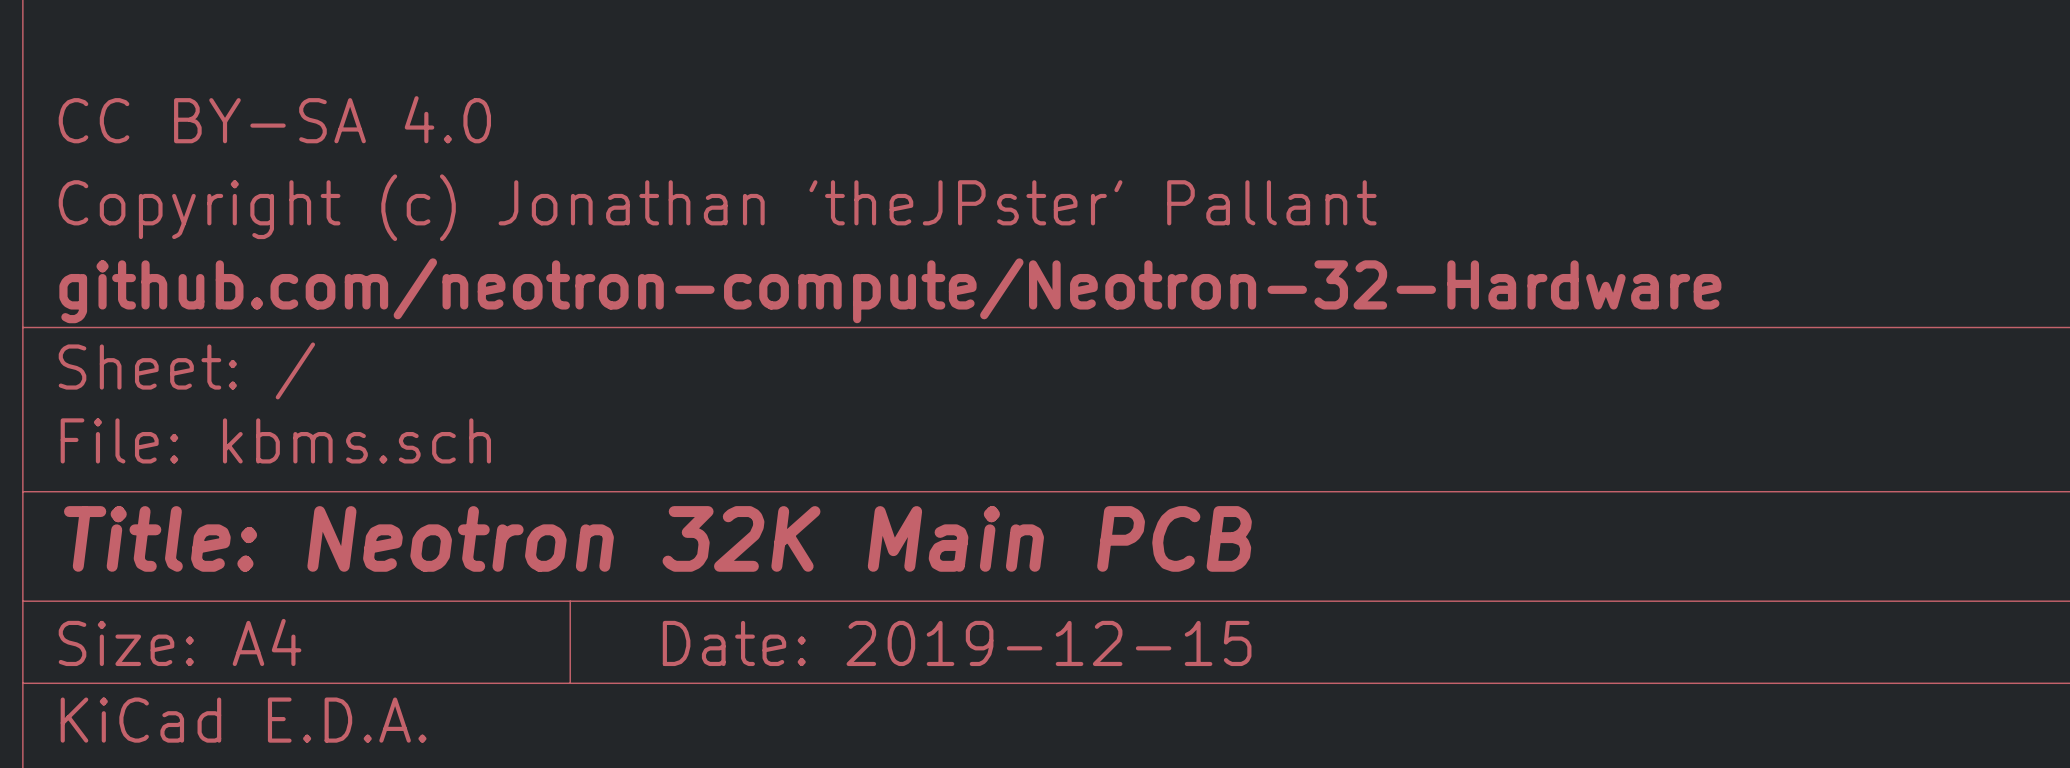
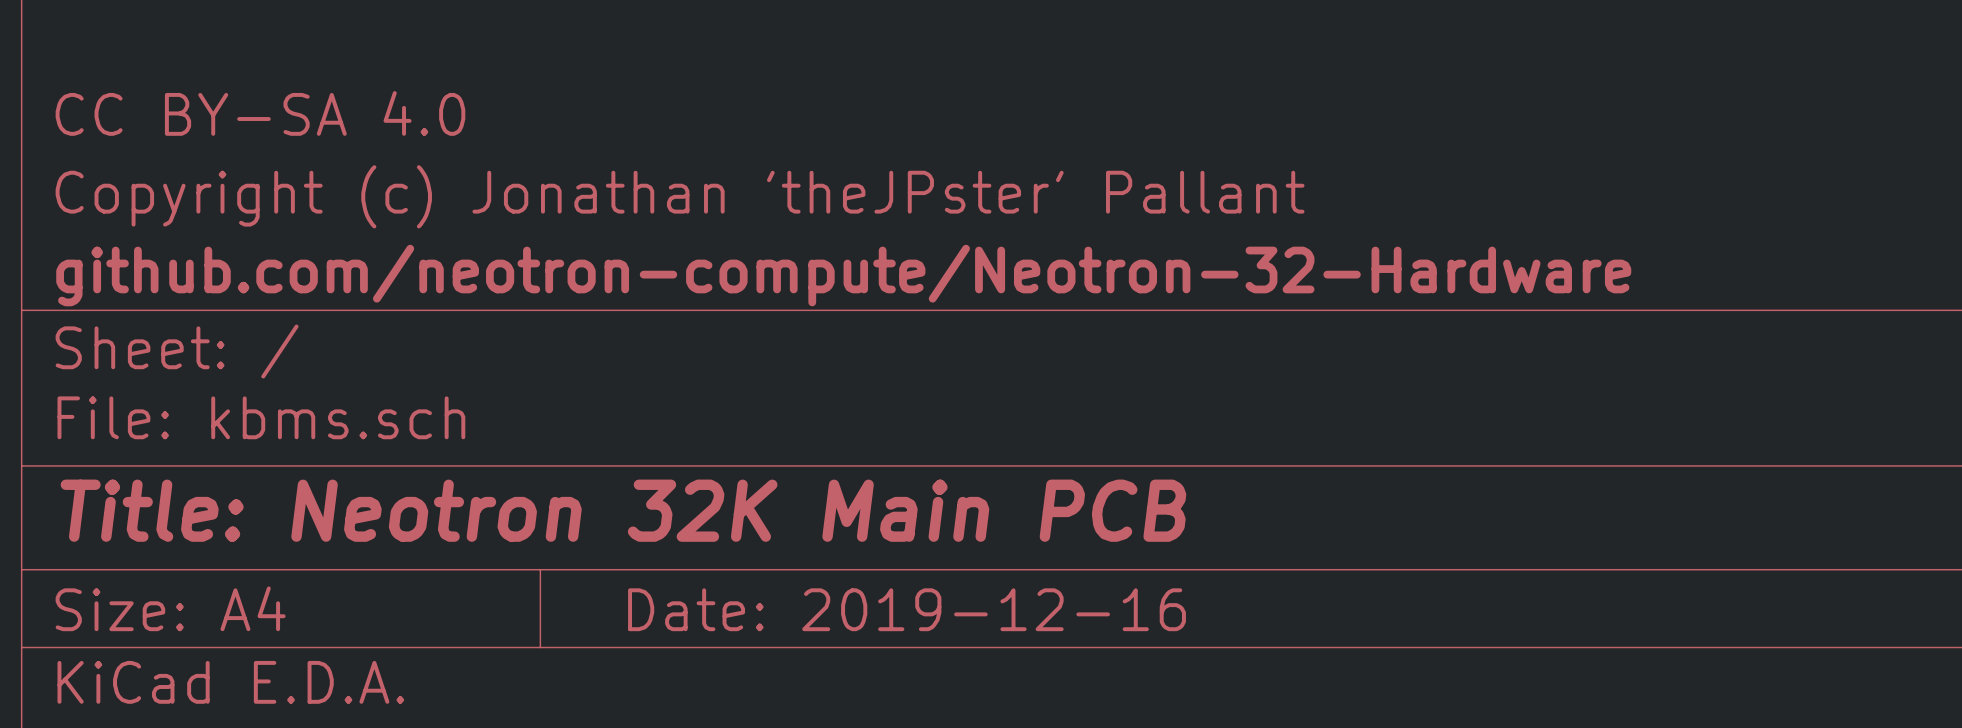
title block: Date: 2019-12-15 (957, 643) -> Date: 2019-12-16 (906, 609)

